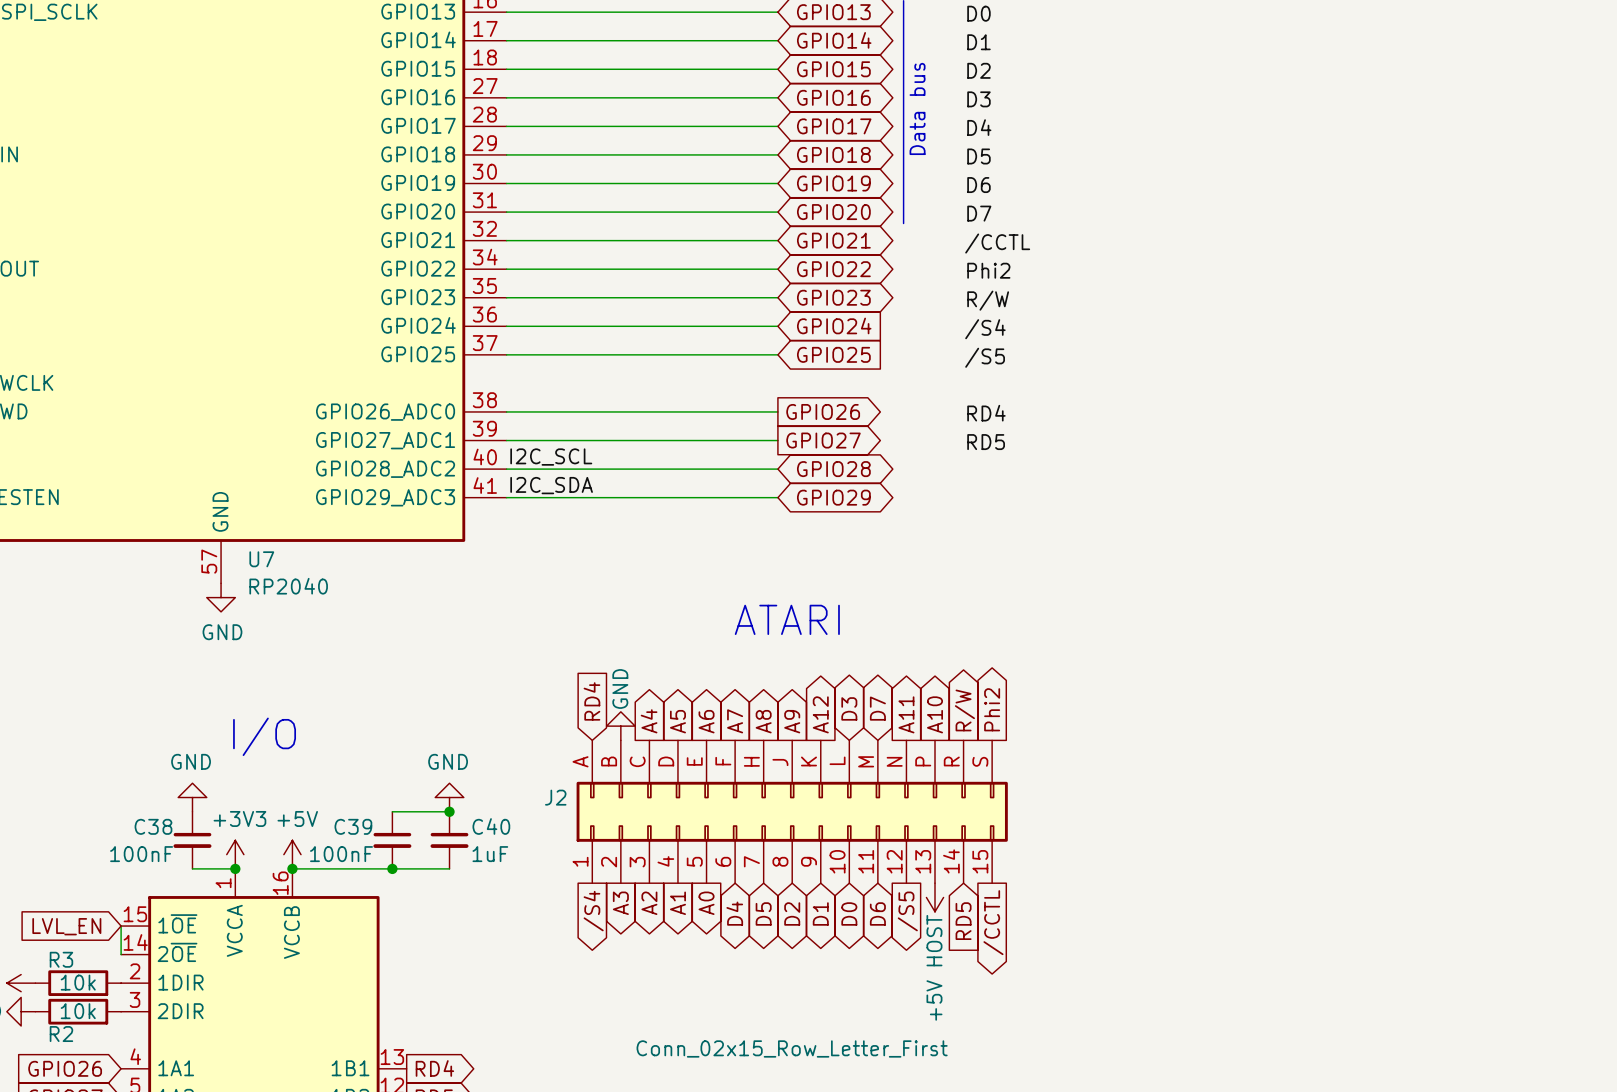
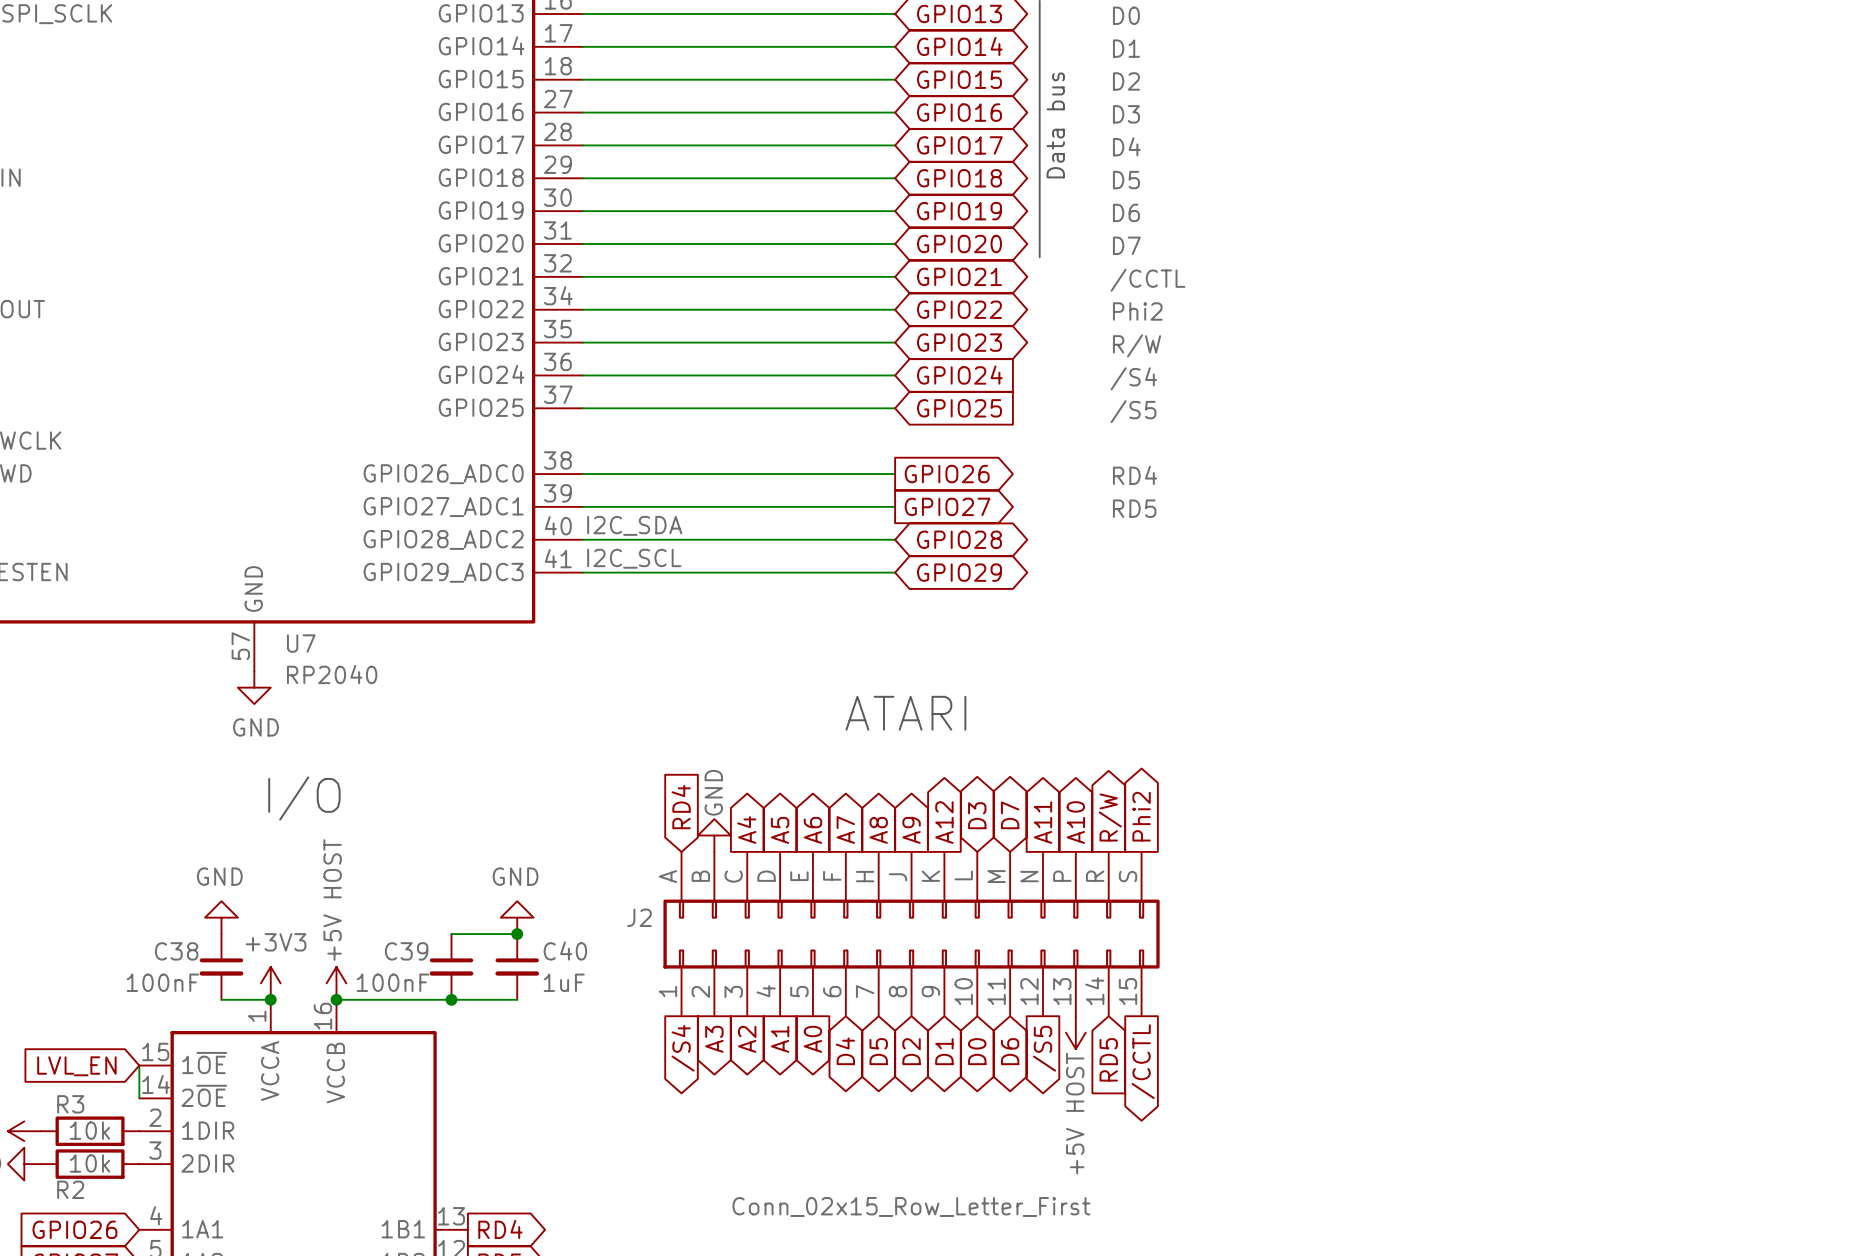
label: I2C_SCL (551, 457) -> I2C_SDA (634, 525)
label: I2C_SDA (551, 485) -> I2C_SCL (634, 558)
text position: I/O (264, 736) -> I/O (304, 798)
power symbol: +5V (292, 854) -> +5V HOST (336, 983)

